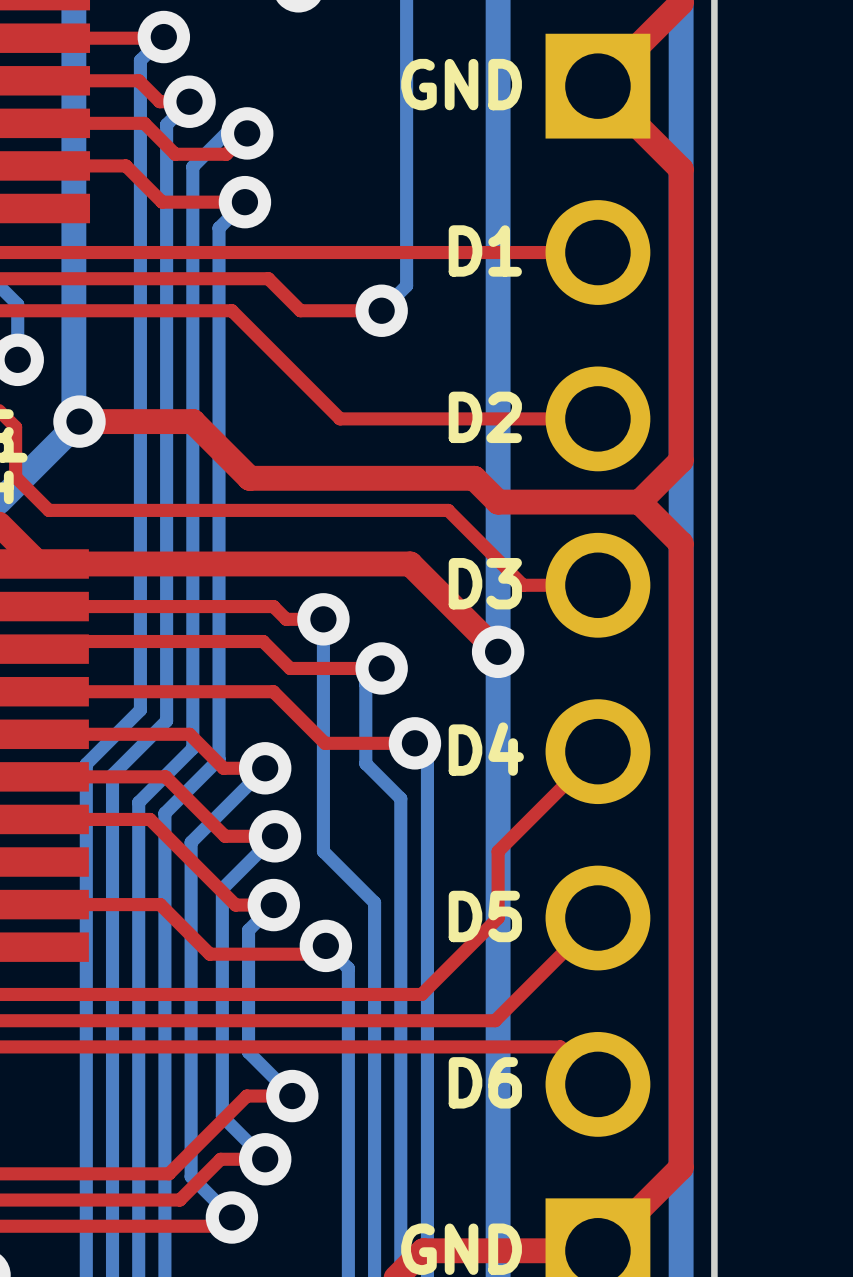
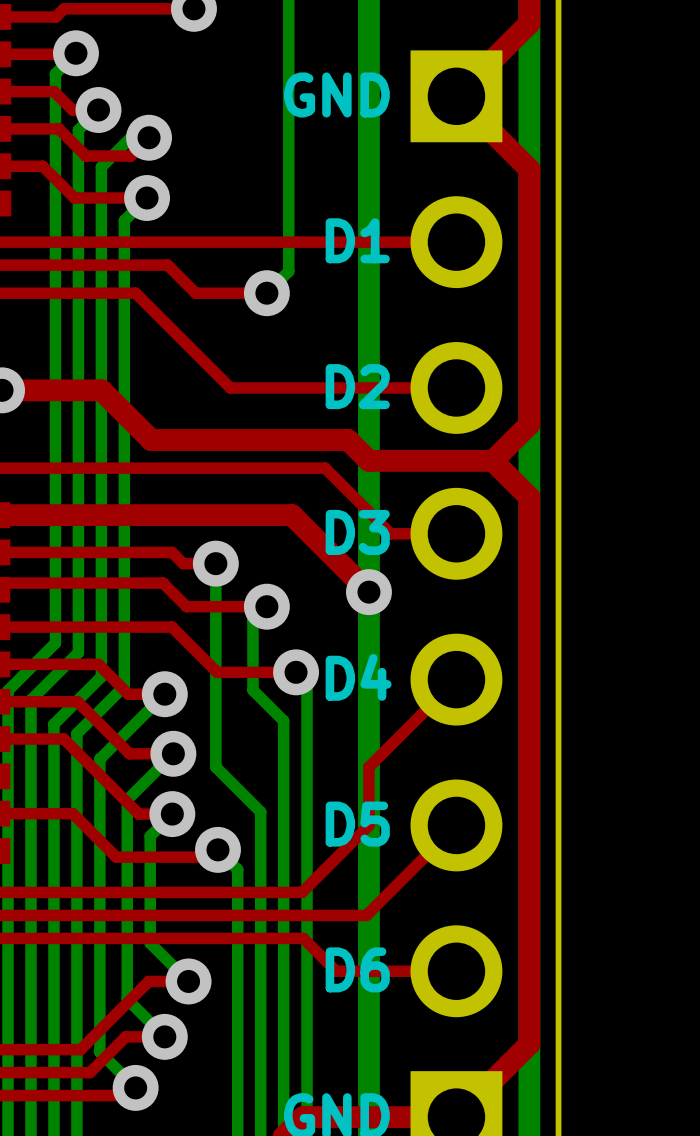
top track: (423, 1046) (560, 1046) (597, 1084) -> (303, 938) (336, 971) (456, 971)

